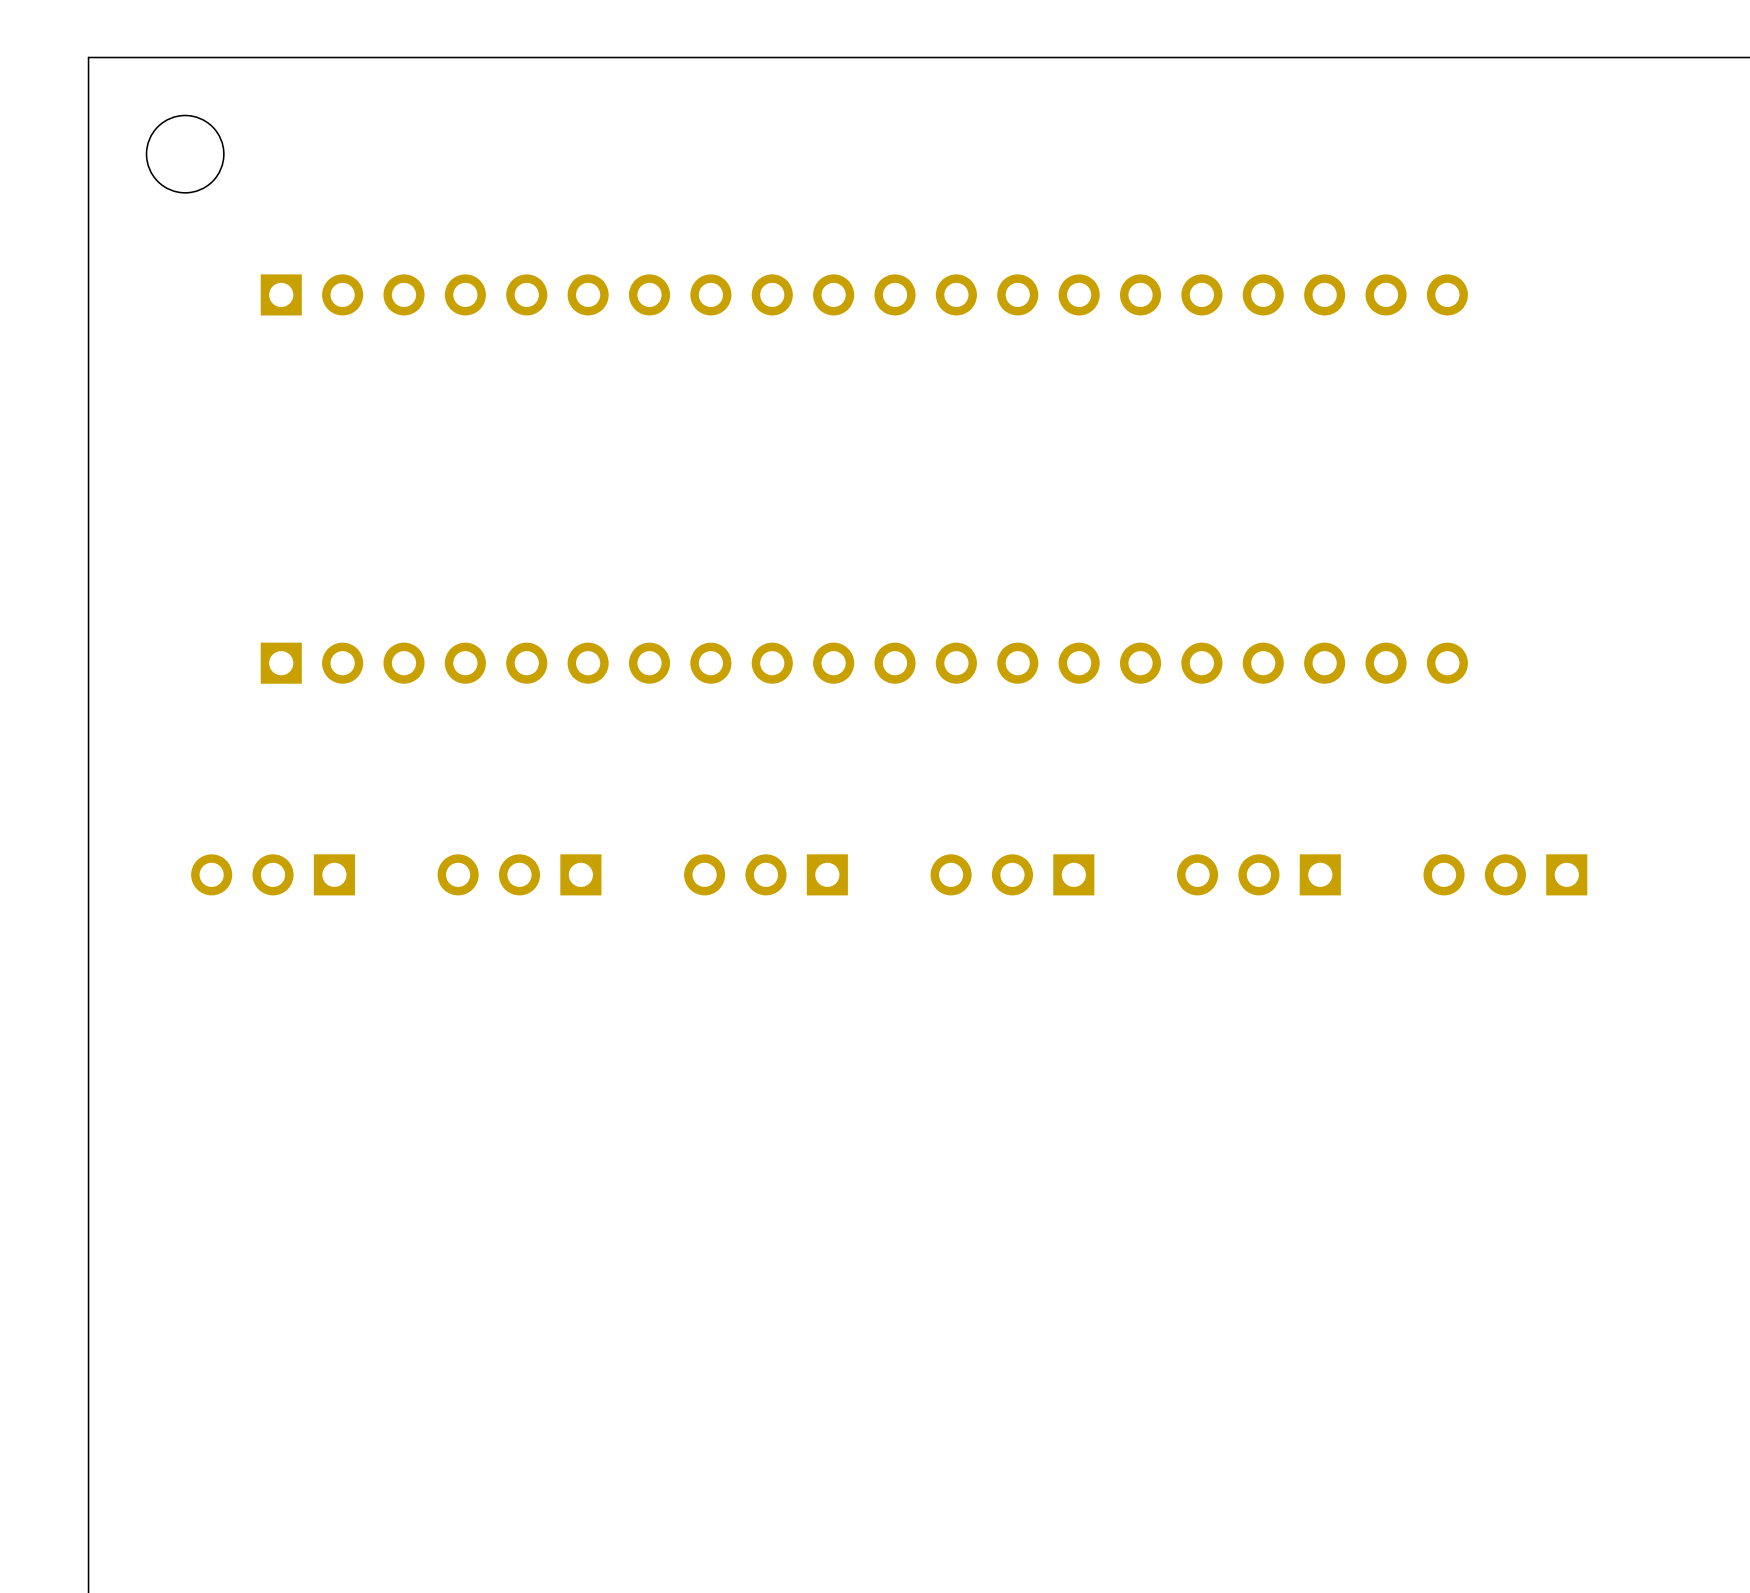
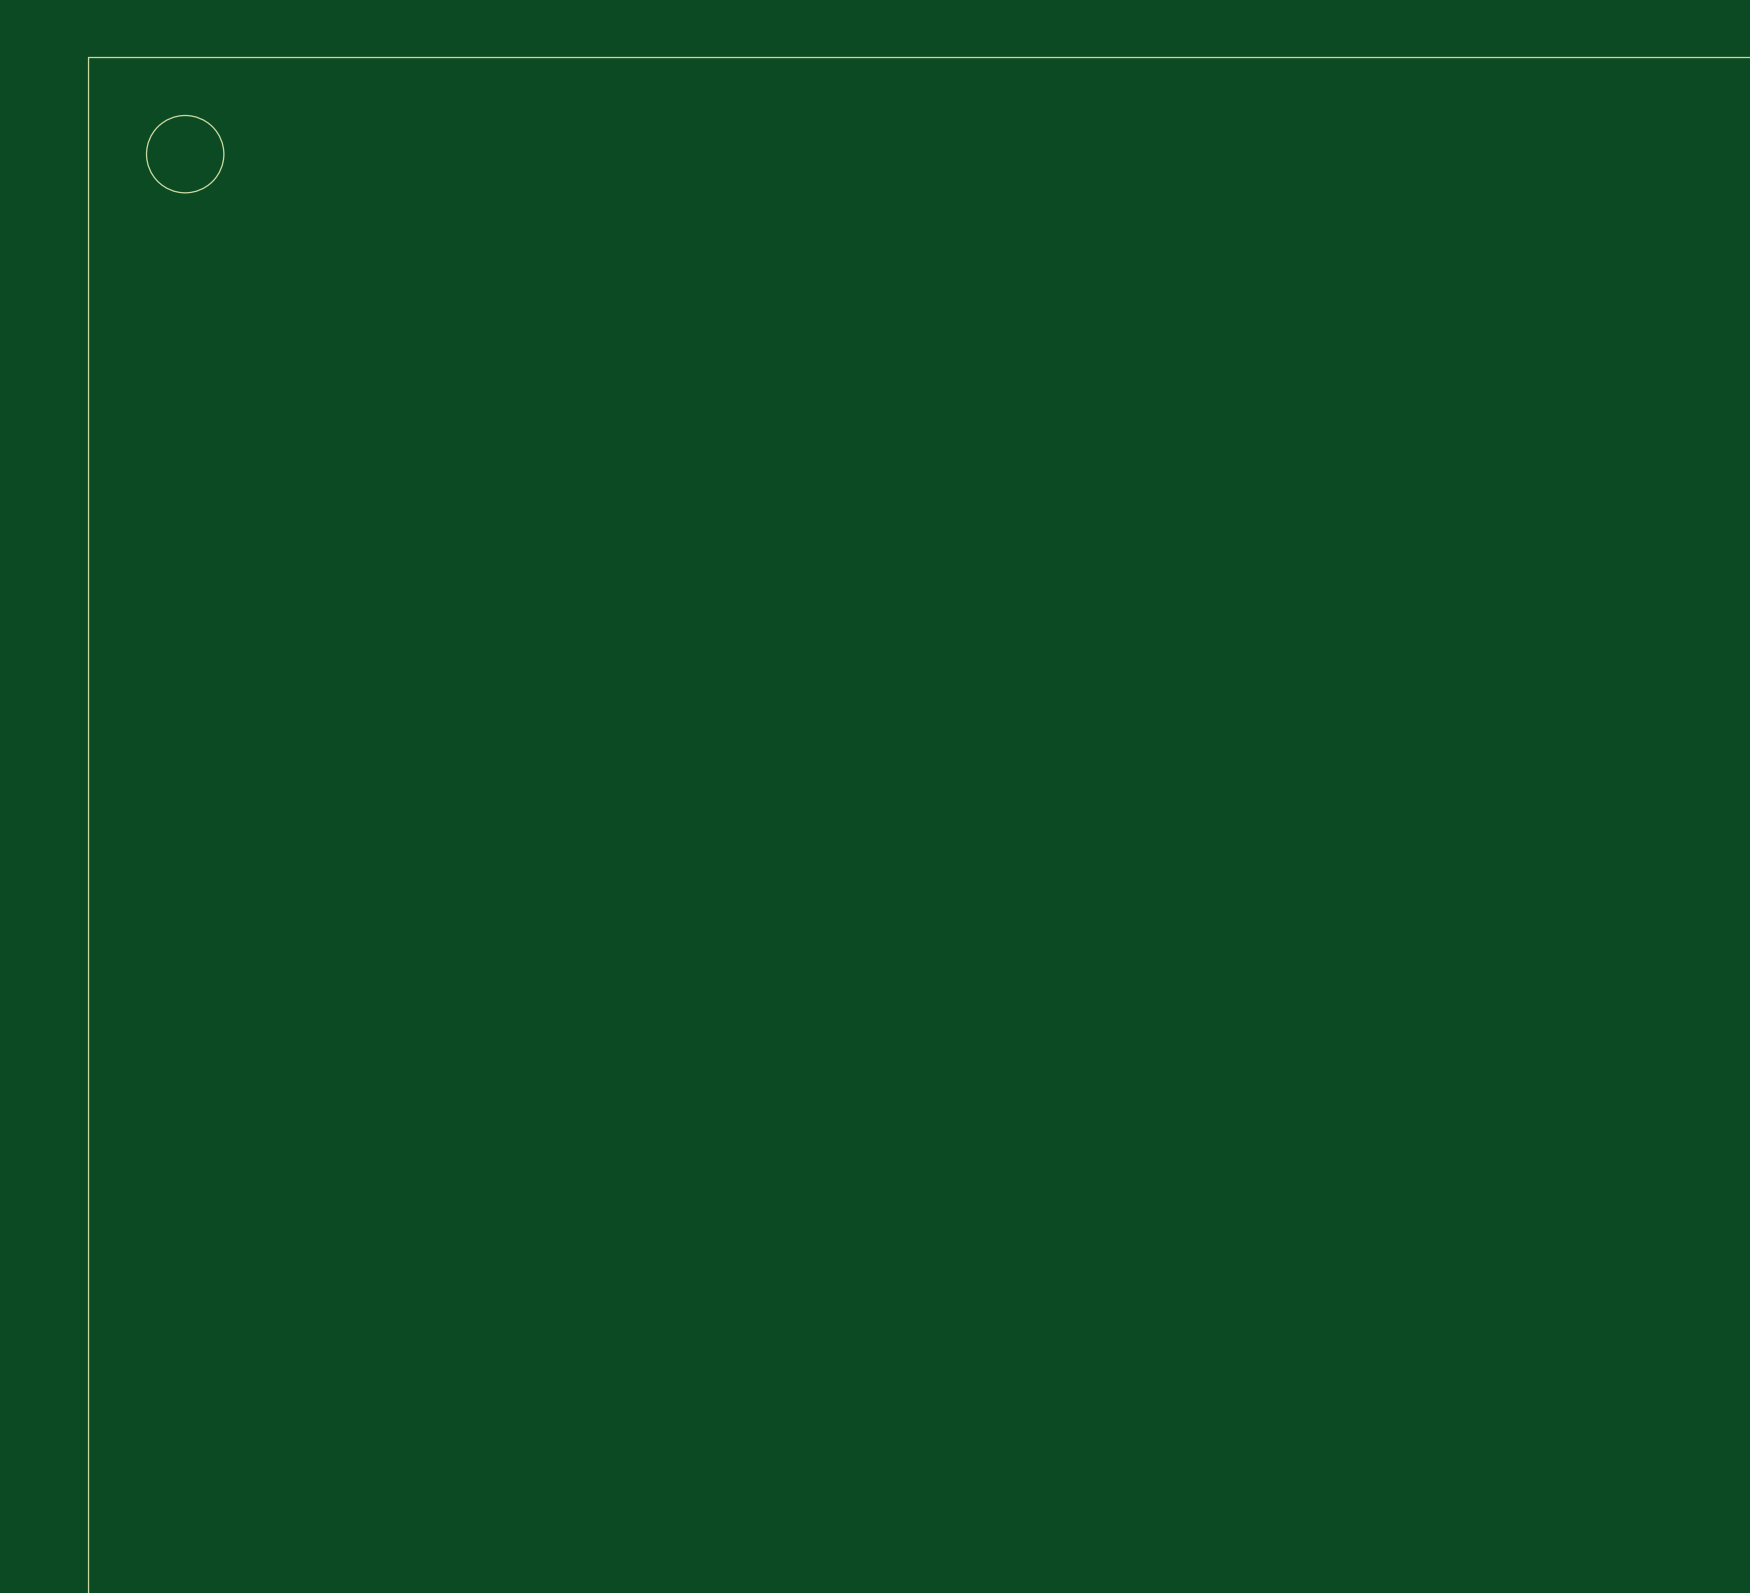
part: (864, 294) -> none
part: (864, 663) -> none
part: (273, 874) -> none
part: (519, 874) -> none
part: (765, 874) -> none
part: (1012, 874) -> none
part: (1258, 874) -> none
part: (1505, 874) -> none

